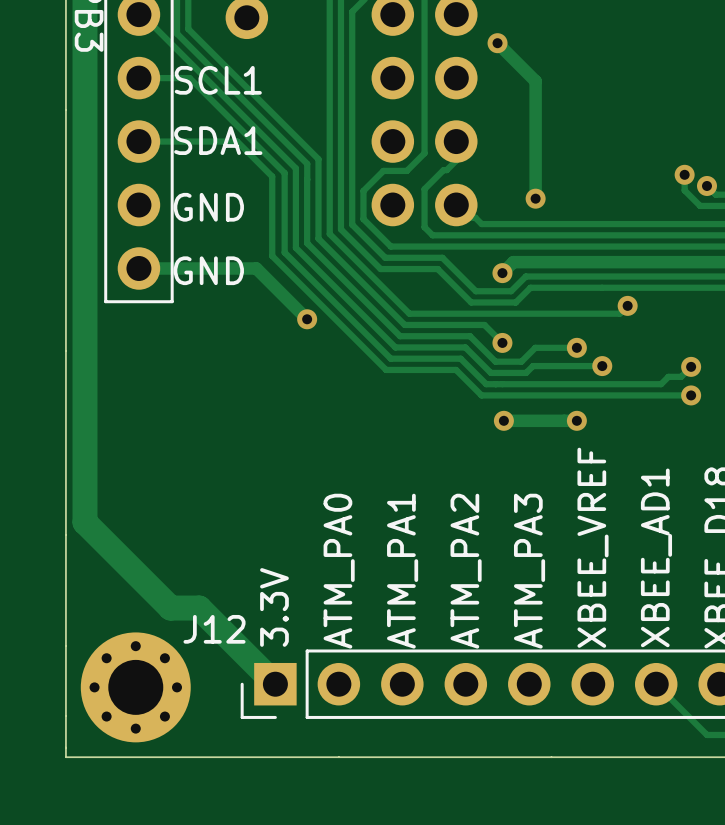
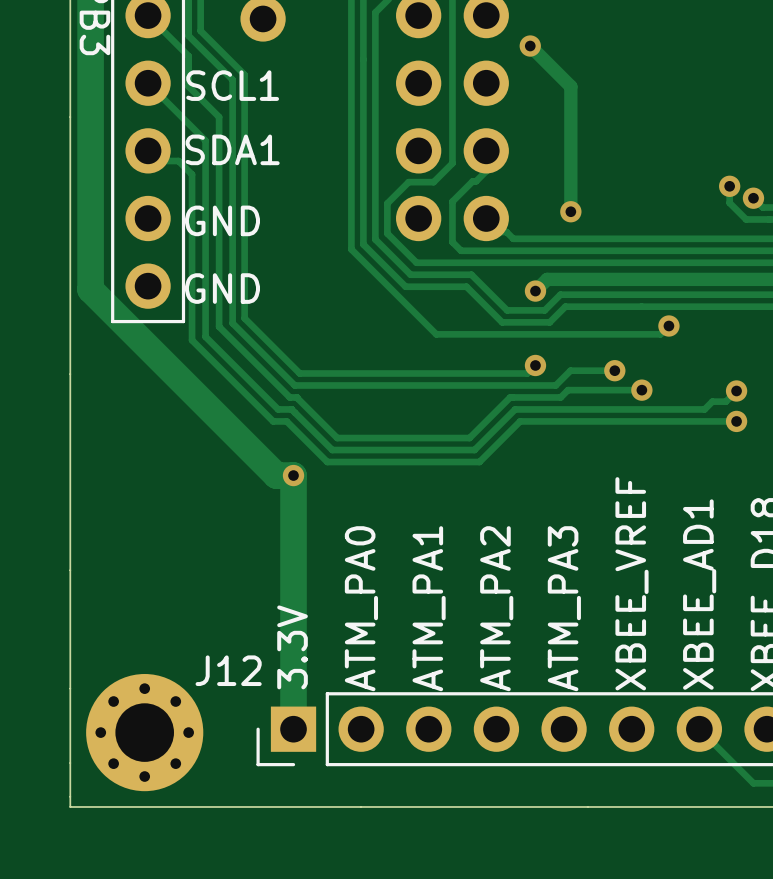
track: (138, 14) (142, 14) (295, 168) (295, 247) (395, 347) (465, 347) (490, 372) -> (148, 15) (188, 56) (188, 86) (219, 117) (219, 326) (289, 397) (297, 397)
track: (229, 70) (318, 159) (318, 238) (404, 324) (484, 324) (502, 342) -> (244, 74) (244, 318) (299, 373) (527, 373) (535, 365)
track: (218, 74) (307, 163) (307, 243) (400, 336) (470, 336) (495, 361) -> (232, 79) (232, 323) (294, 385) (528, 385)
track: (138, 78) (189, 78) (284, 173) (284, 252) (390, 358) (460, 358) (486, 384) -> (148, 83) (205, 140) (205, 336) (278, 409) (291, 409) (332, 450) (474, 450) (515, 409) (518, 409)
track: (138, 141) (237, 141) (272, 176) (272, 256) (386, 369) (456, 369) (481, 395) (488, 395) -> (148, 150) (158, 161) (178, 161) (192, 174) (192, 340) (273, 421) (286, 421) (327, 462) (479, 462) (520, 421)
track: (138, 268) (256, 268) (307, 319) -> none
track: (85, 271) (85, 522) (170, 608) (199, 608) (275, 684) -> (90, 289) (276, 475) (293, 475) (293, 729)
via: (307, 319) -> none
track: none -> (523, 397) (510, 397) (469, 438) (337, 438) (297, 397)
via: (503, 420) -> none
track: (576, 420) (503, 420) -> none
via: (576, 420) -> none
via: none -> (293, 475)

